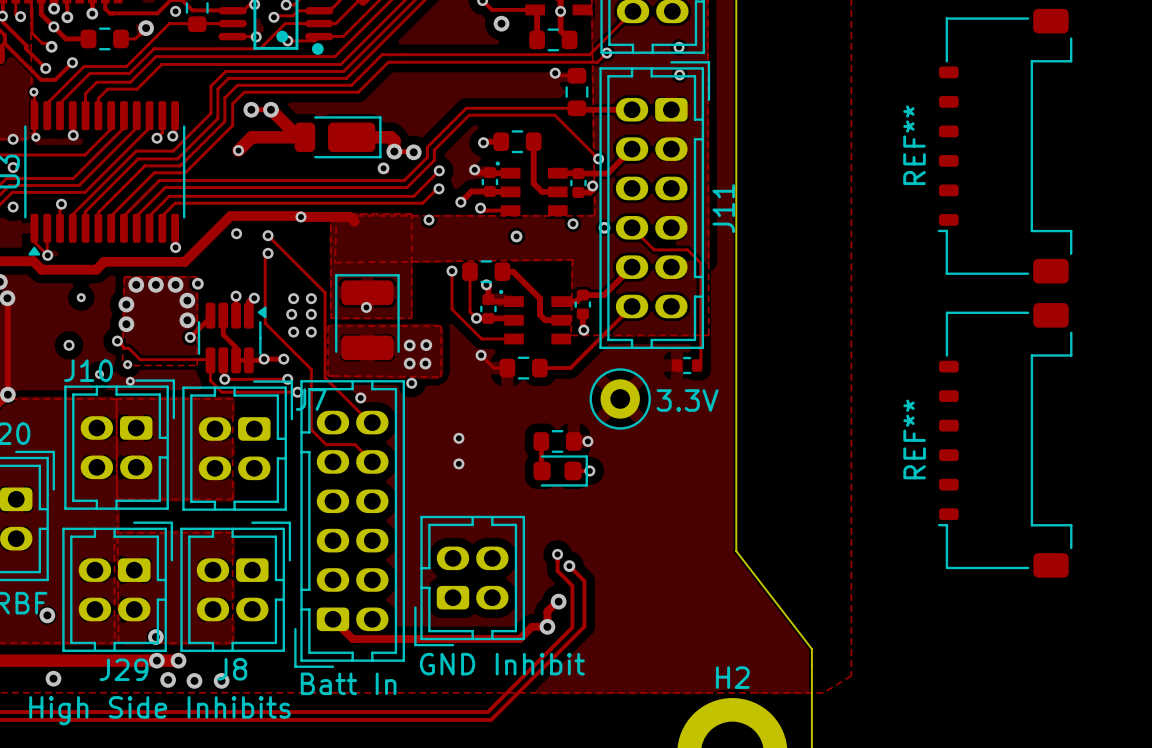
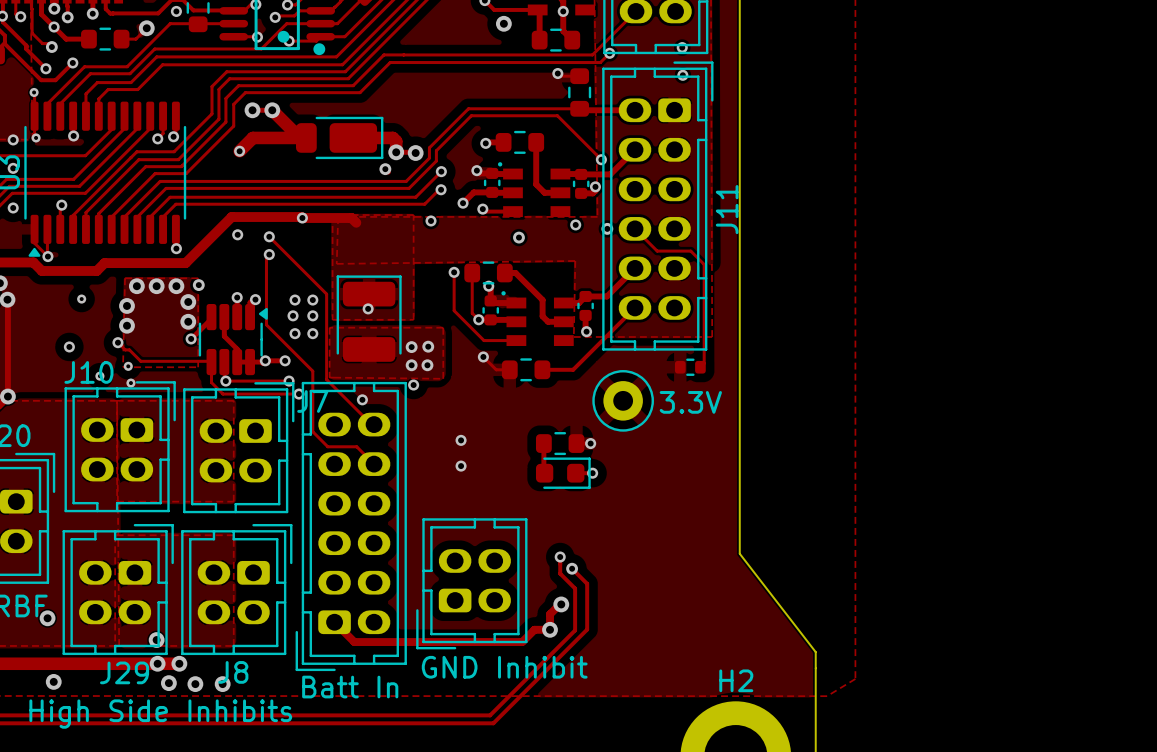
REF**: (1005, 146) -> none
REF**: (1005, 440) -> none

